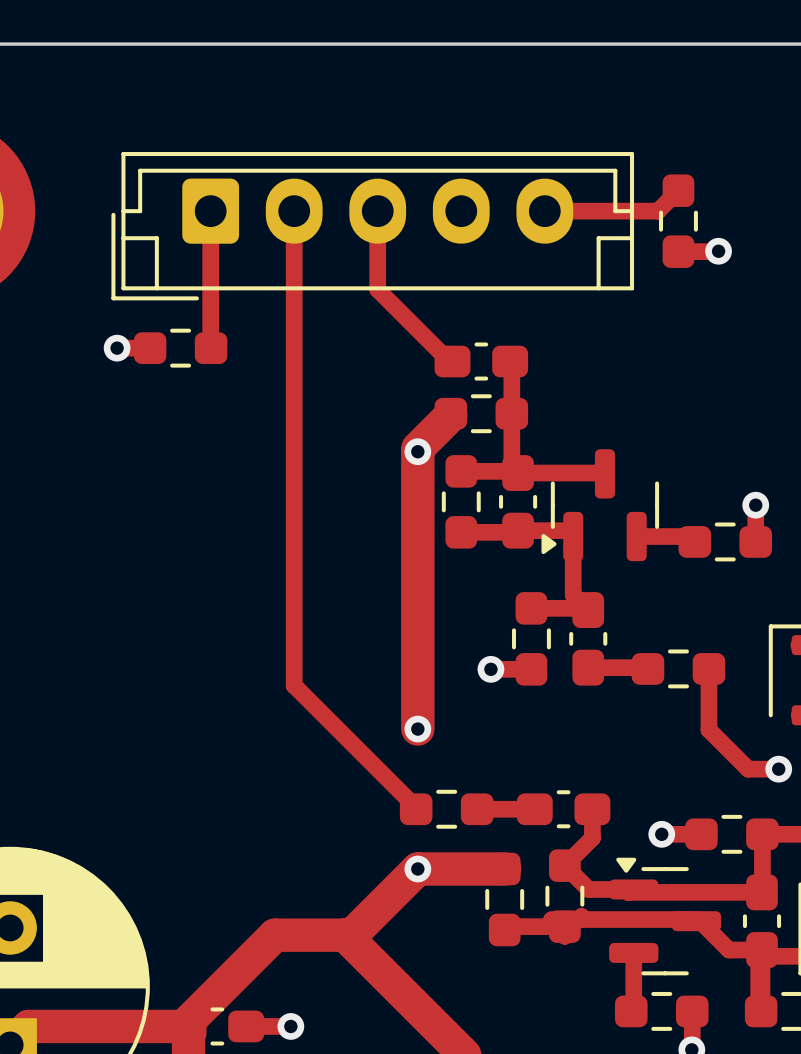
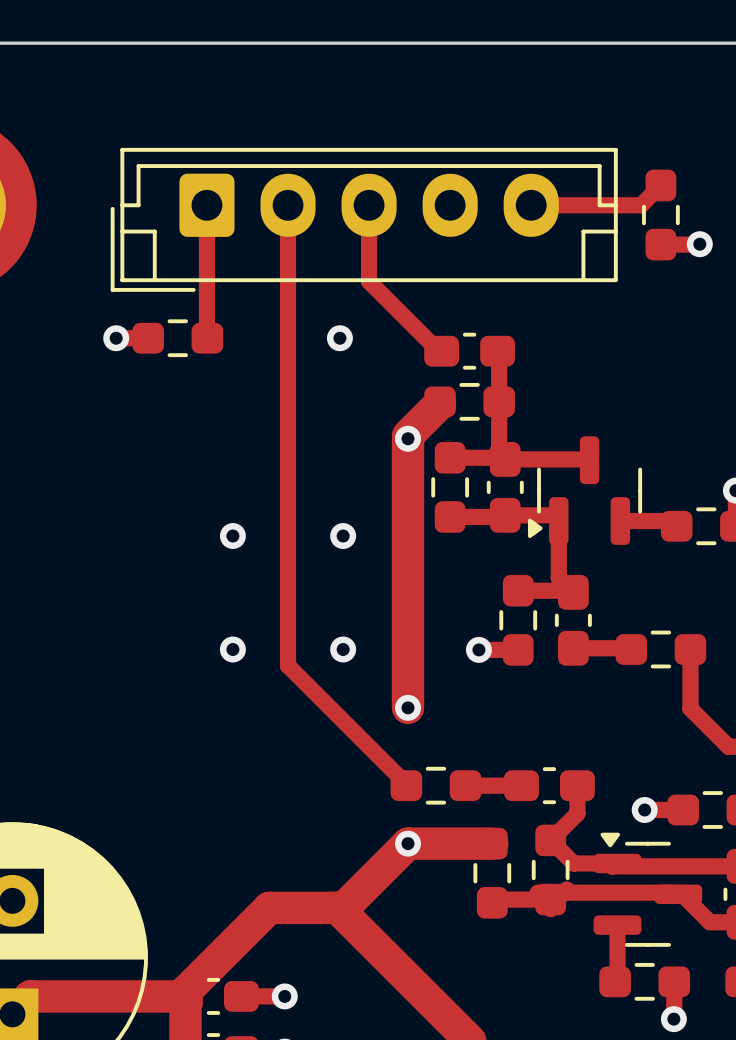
via: none -> (339, 338)
via: none -> (232, 536)
via: none -> (343, 536)
via: none -> (232, 649)
via: none -> (343, 649)

